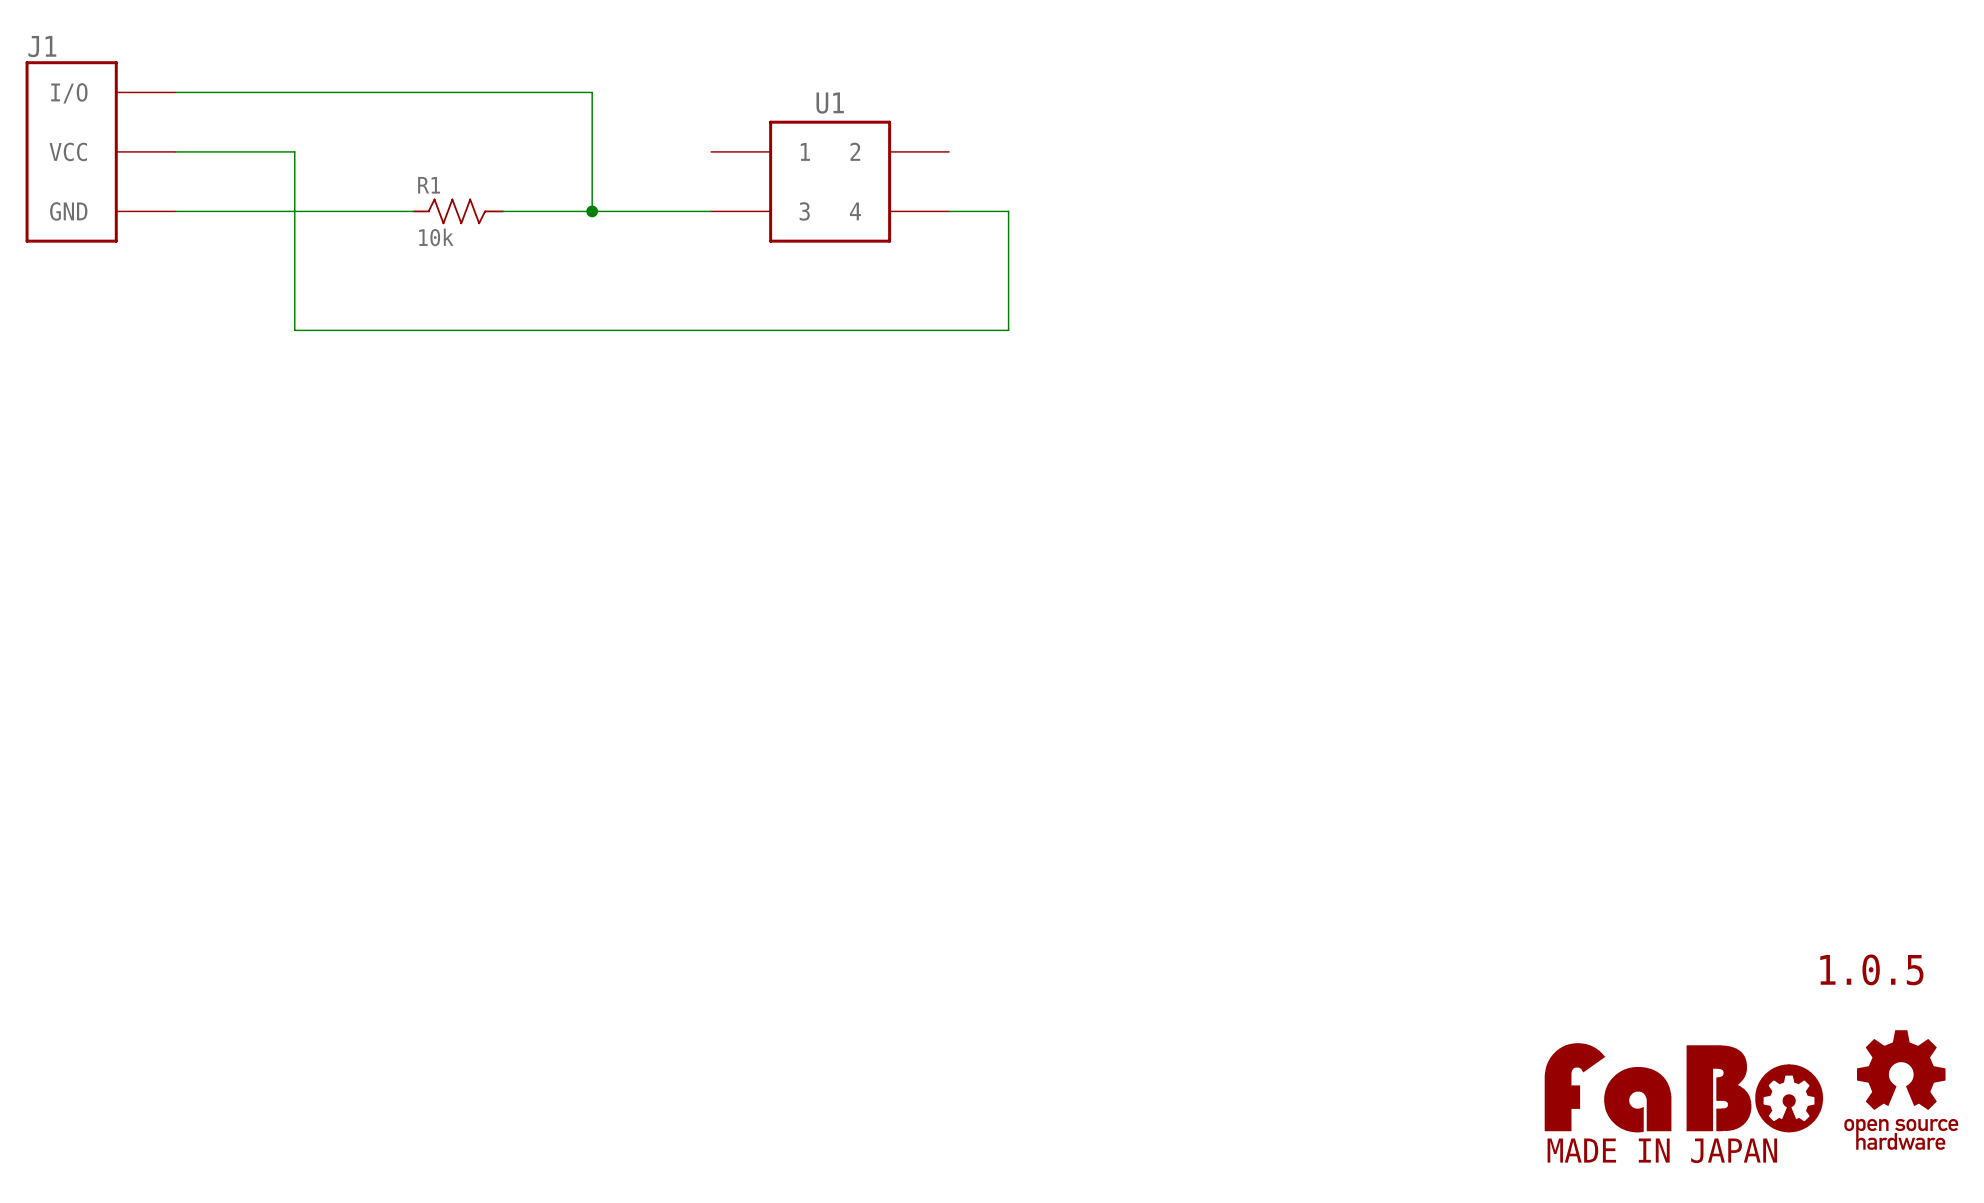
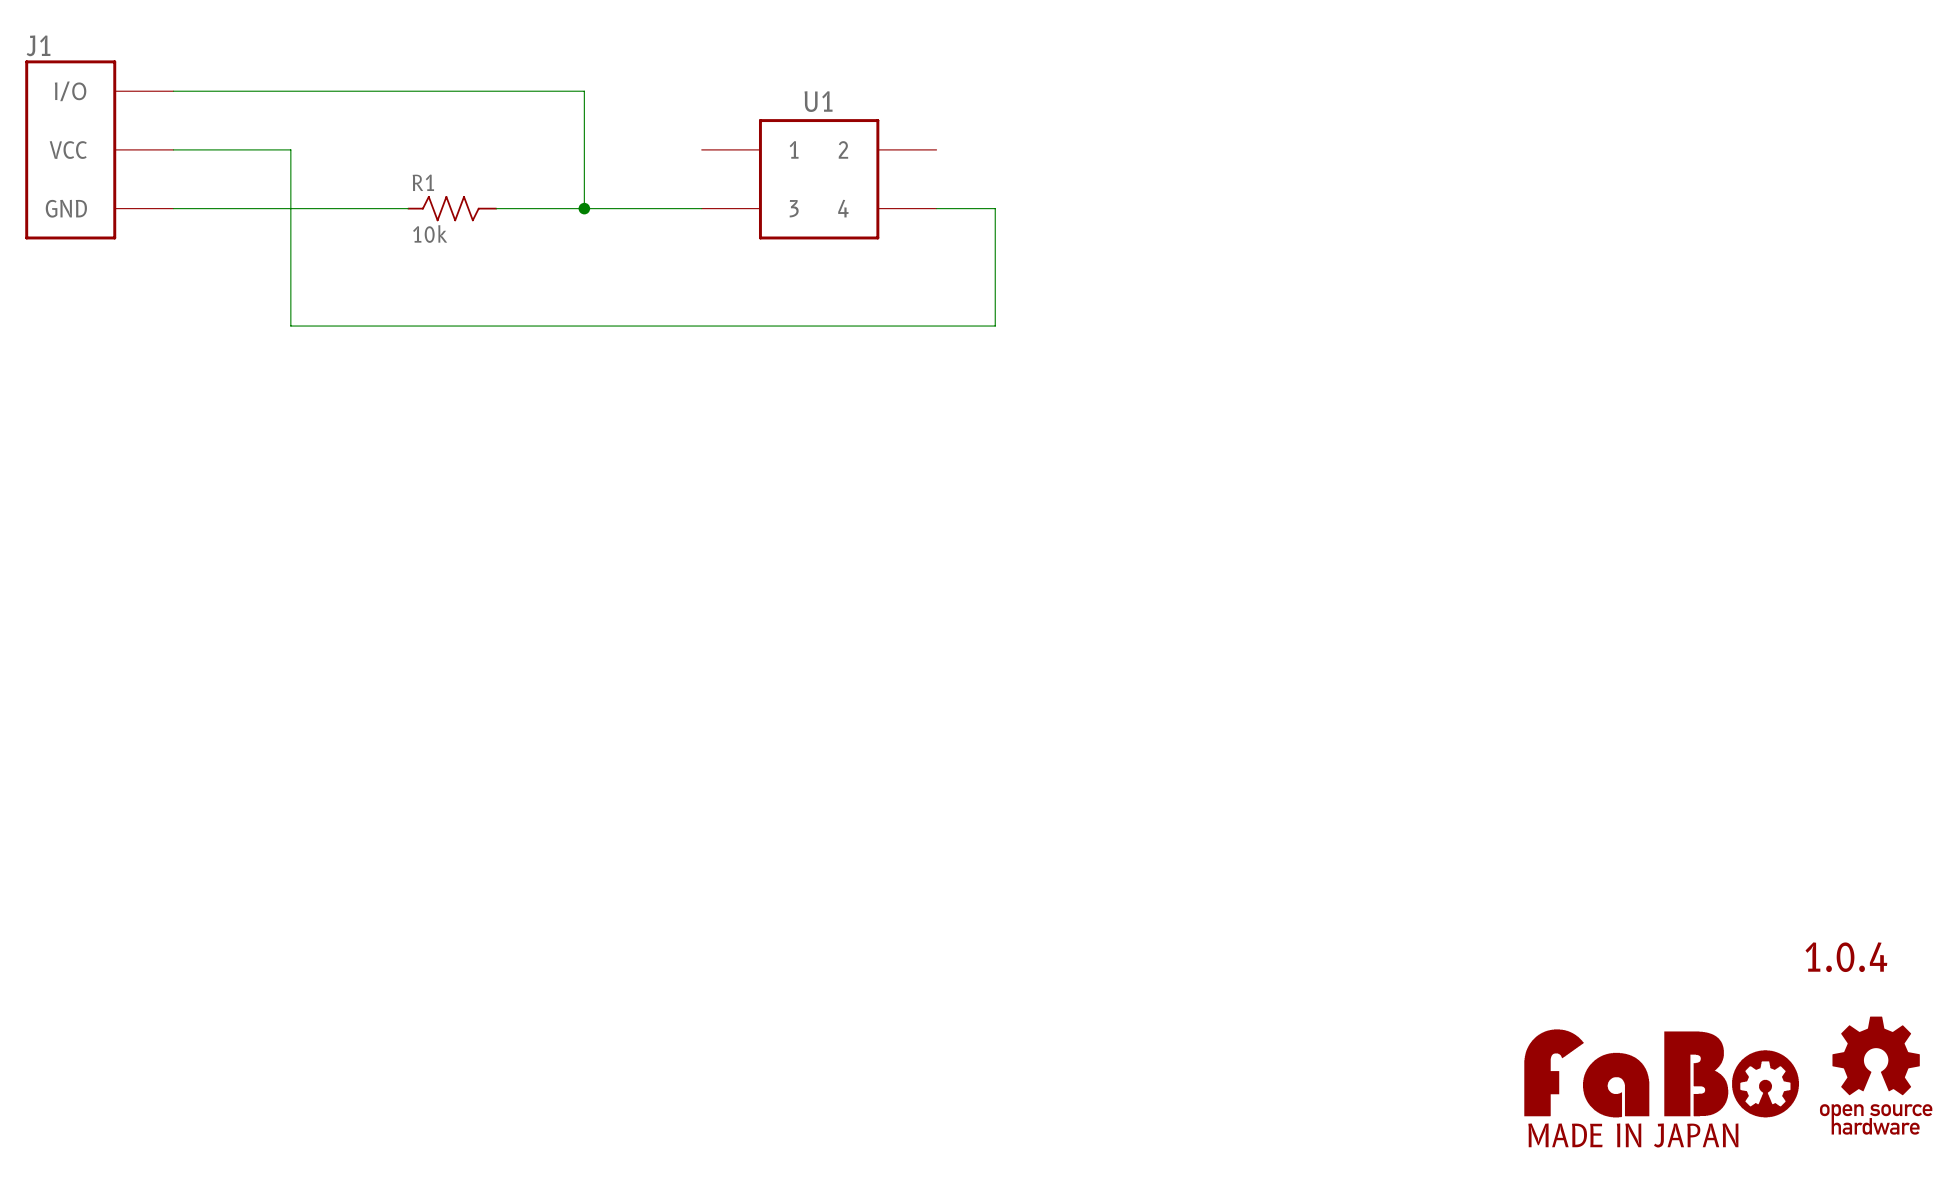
text: 1.0.5 (1871, 969) -> 1.0.4 (1846, 957)

